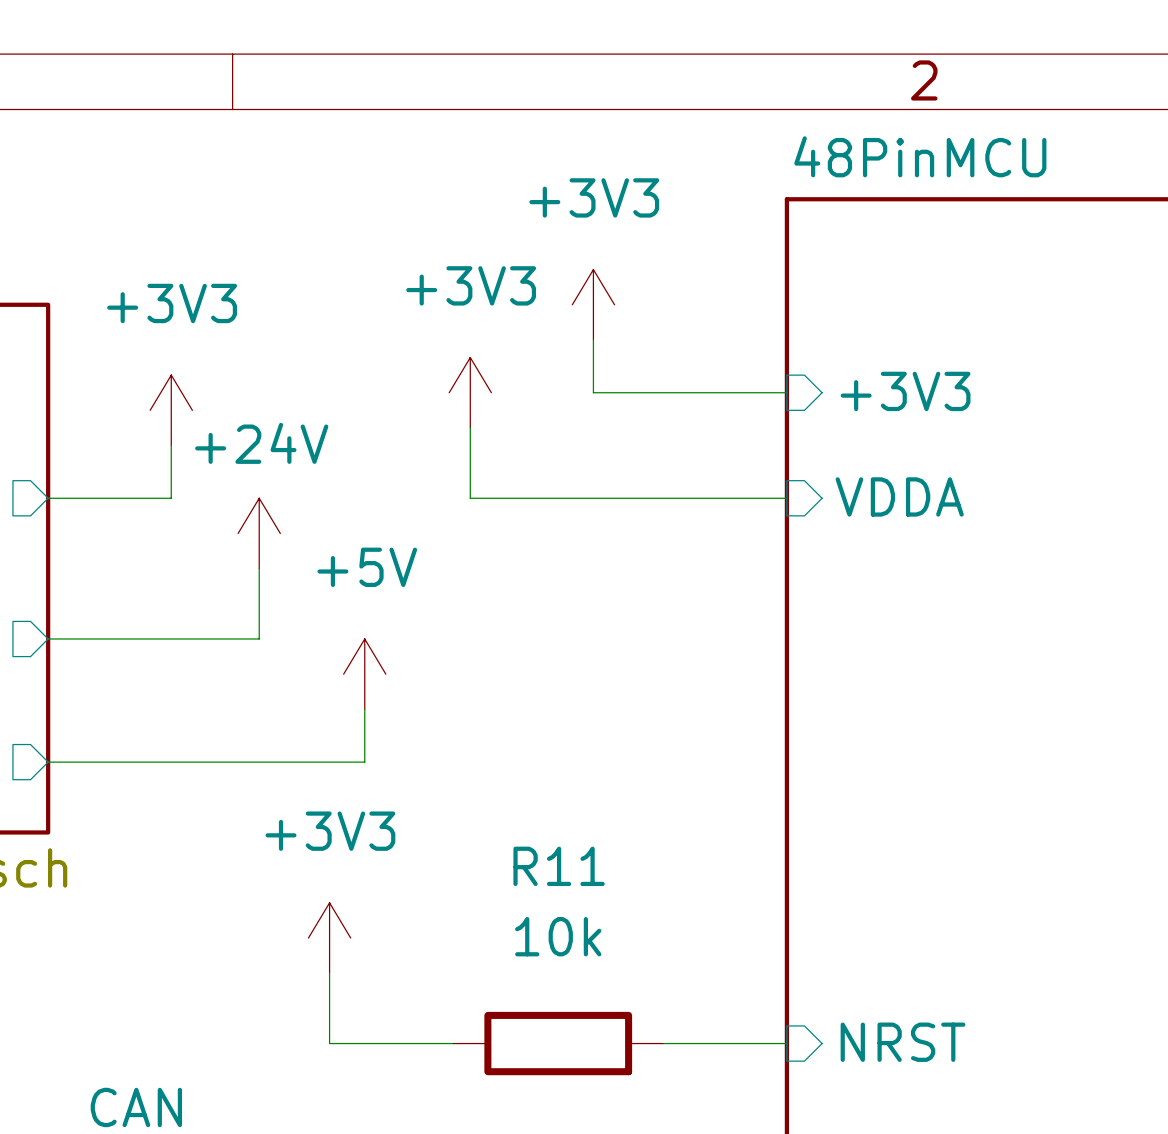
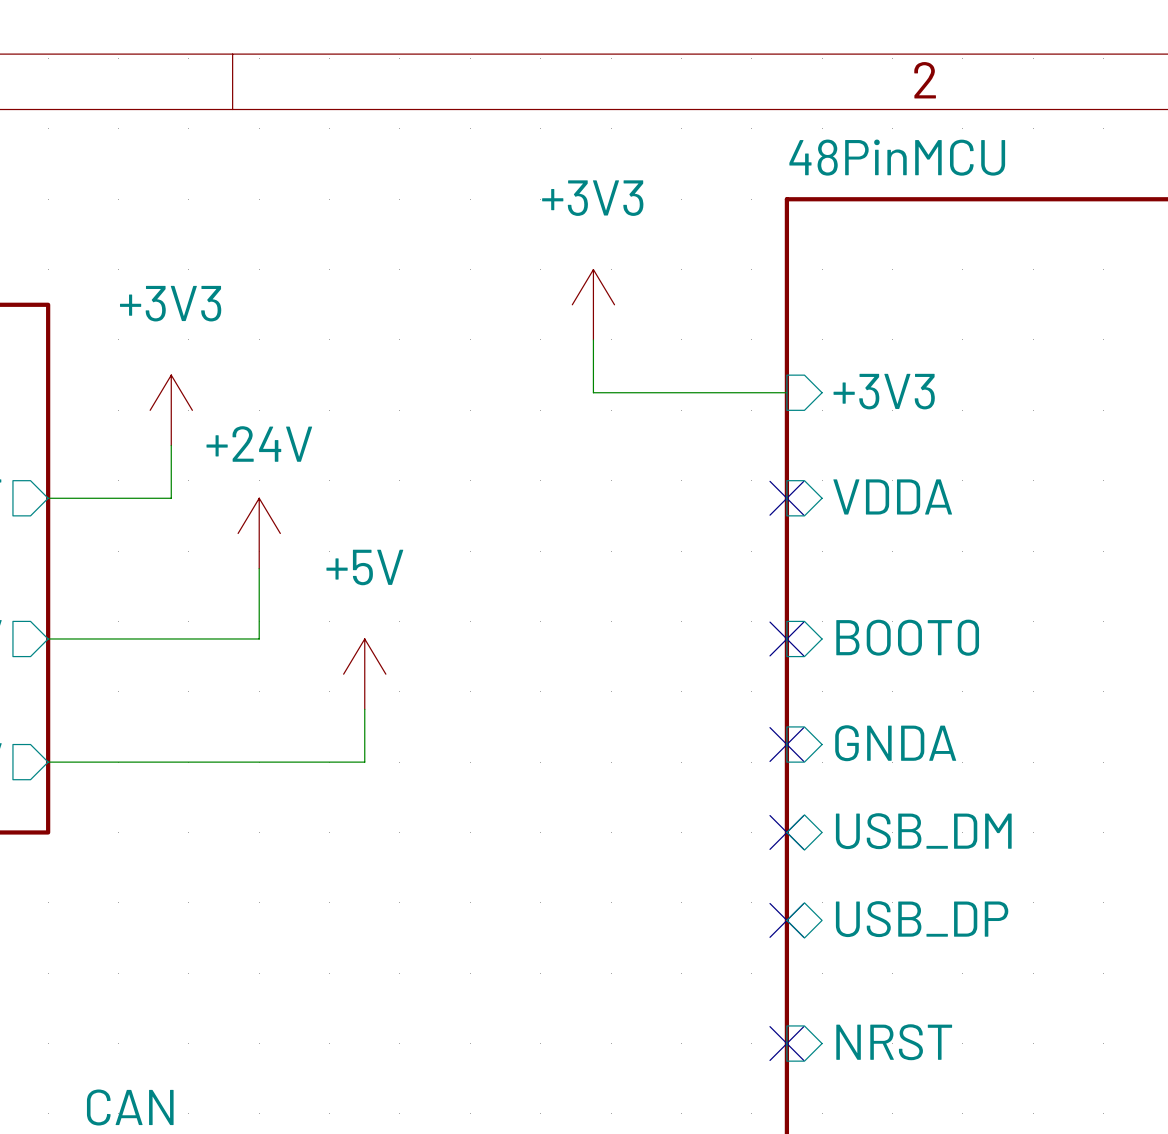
power symbol: +3V3 (470, 392) -> none
wire: (470, 427) (470, 498) (786, 498) -> none
no-connect mark: none -> (786, 498)
sheet pin: none -> BOOT0 (907, 637)
no-connect mark: none -> (786, 638)
sheet pin: none -> GNDA (895, 743)
no-connect mark: none -> (786, 744)
no-connect mark: none -> (786, 832)
sheet pin: none -> USB_DM (923, 831)
no-connect mark: none -> (786, 920)
sheet pin: none -> USB_DP (922, 919)
power symbol: +3V3 (329, 938) -> none
wire: (329, 973) (329, 1043) (452, 1043) -> none
R11: 10k (558, 1043) -> none
wire: (663, 1043) (786, 1043) -> none
no-connect mark: none -> (786, 1043)

